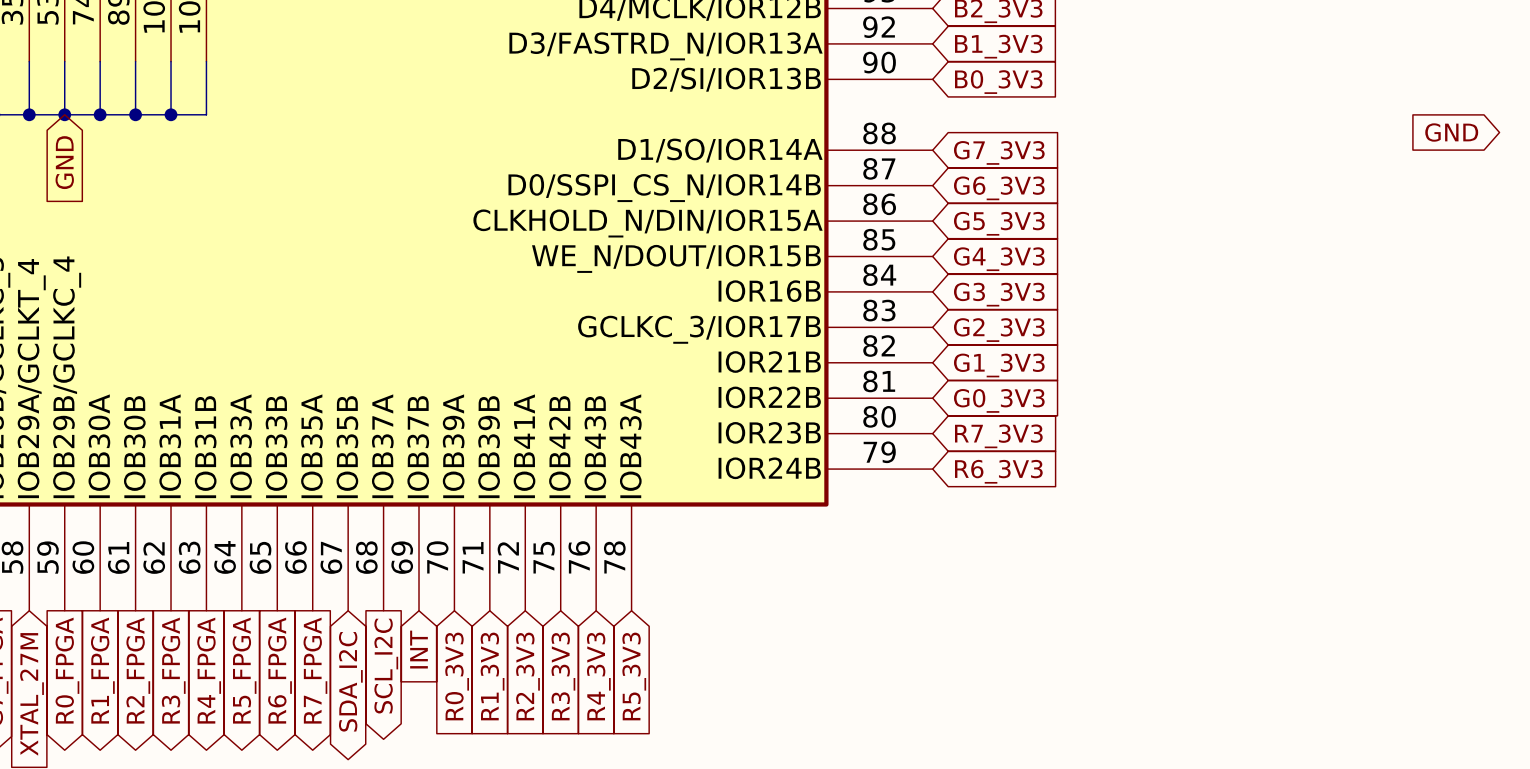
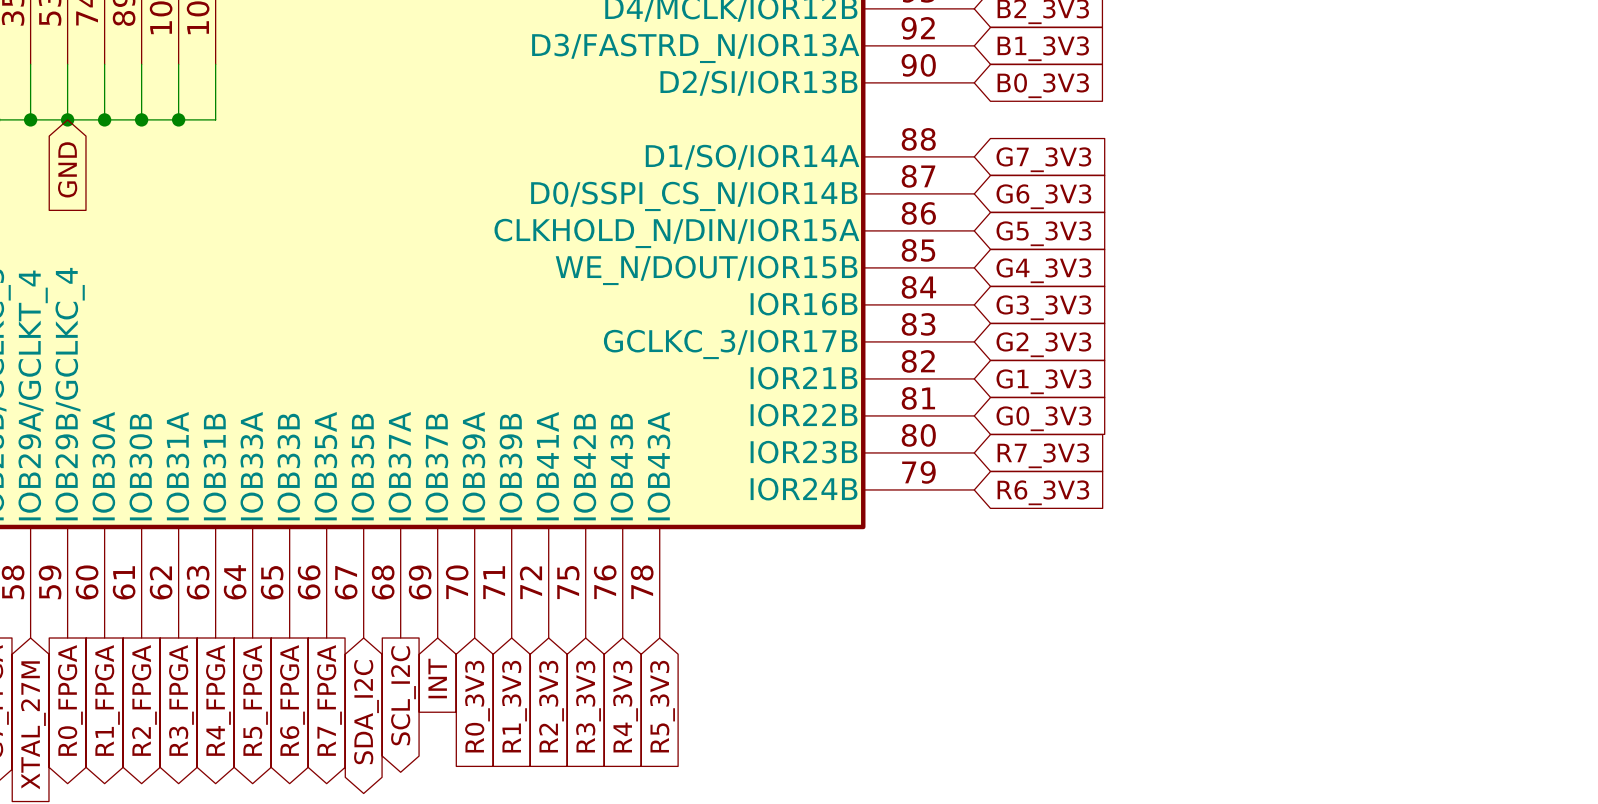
global label: GND (1451, 132) -> none

